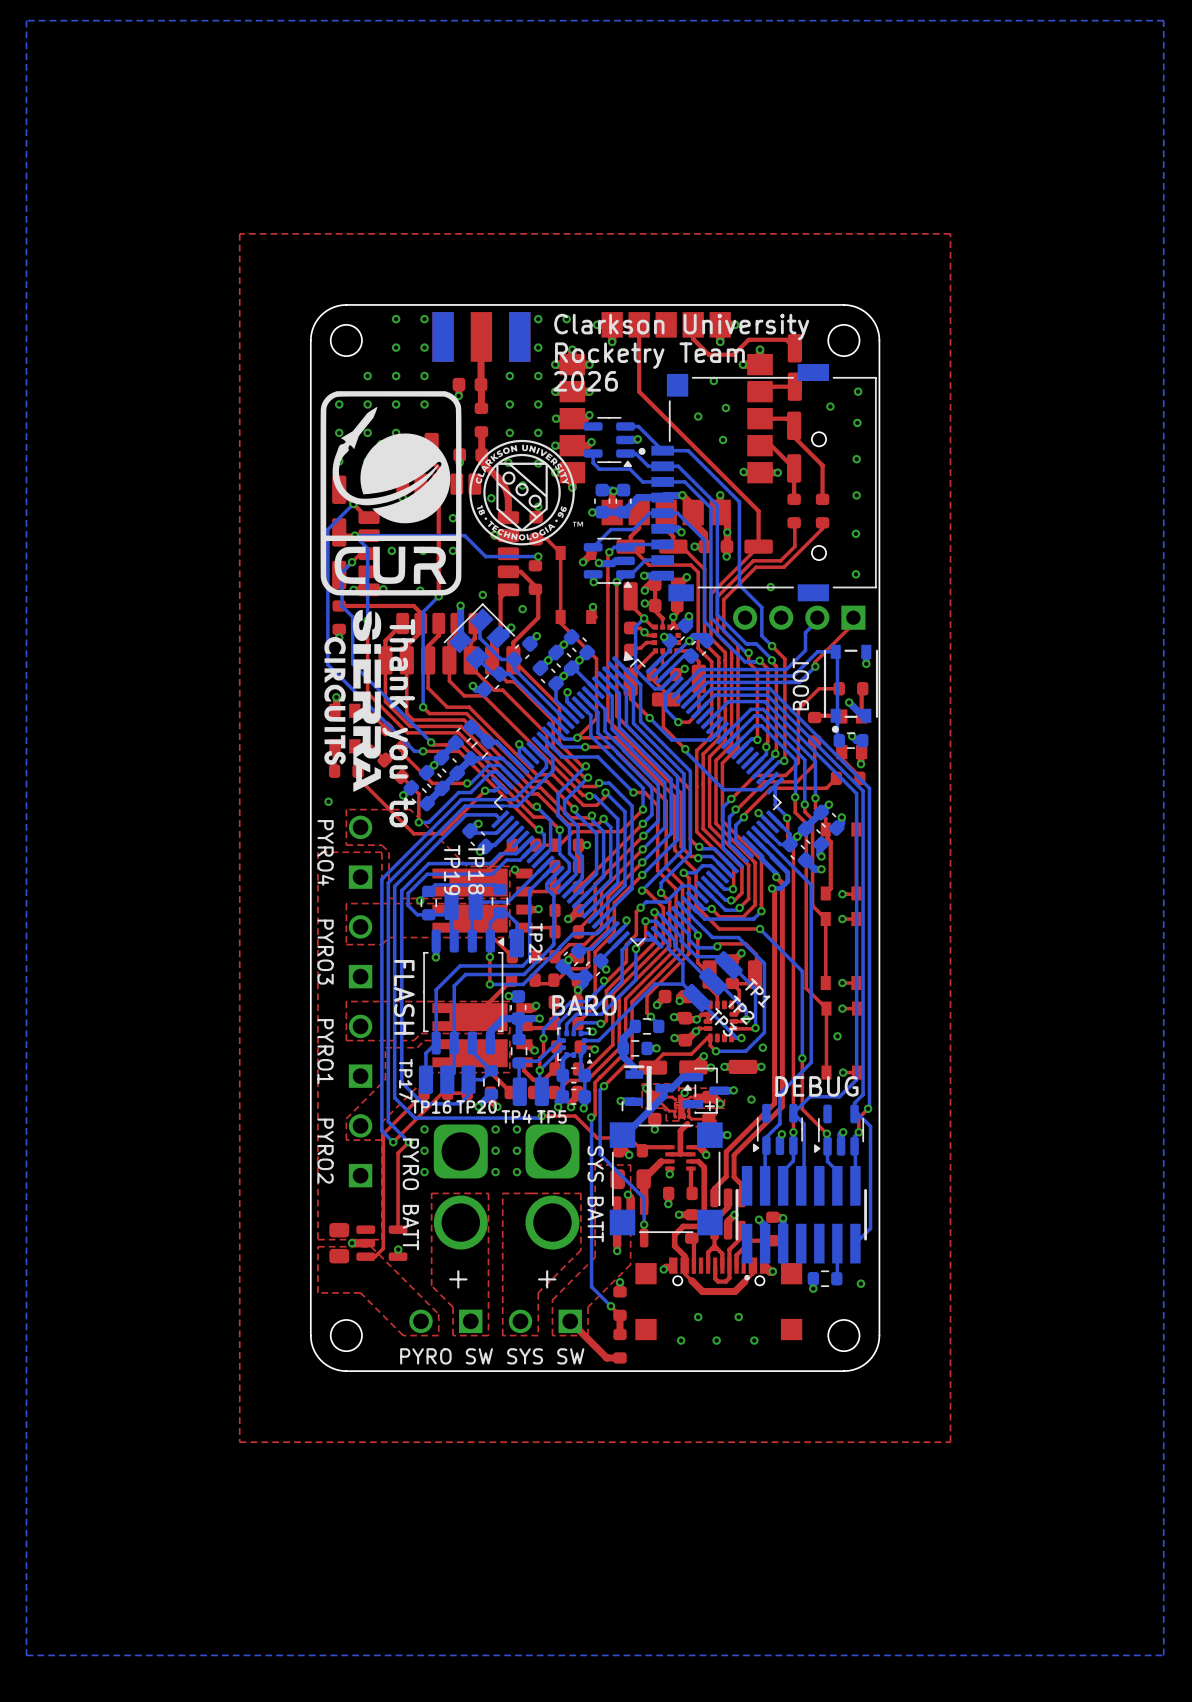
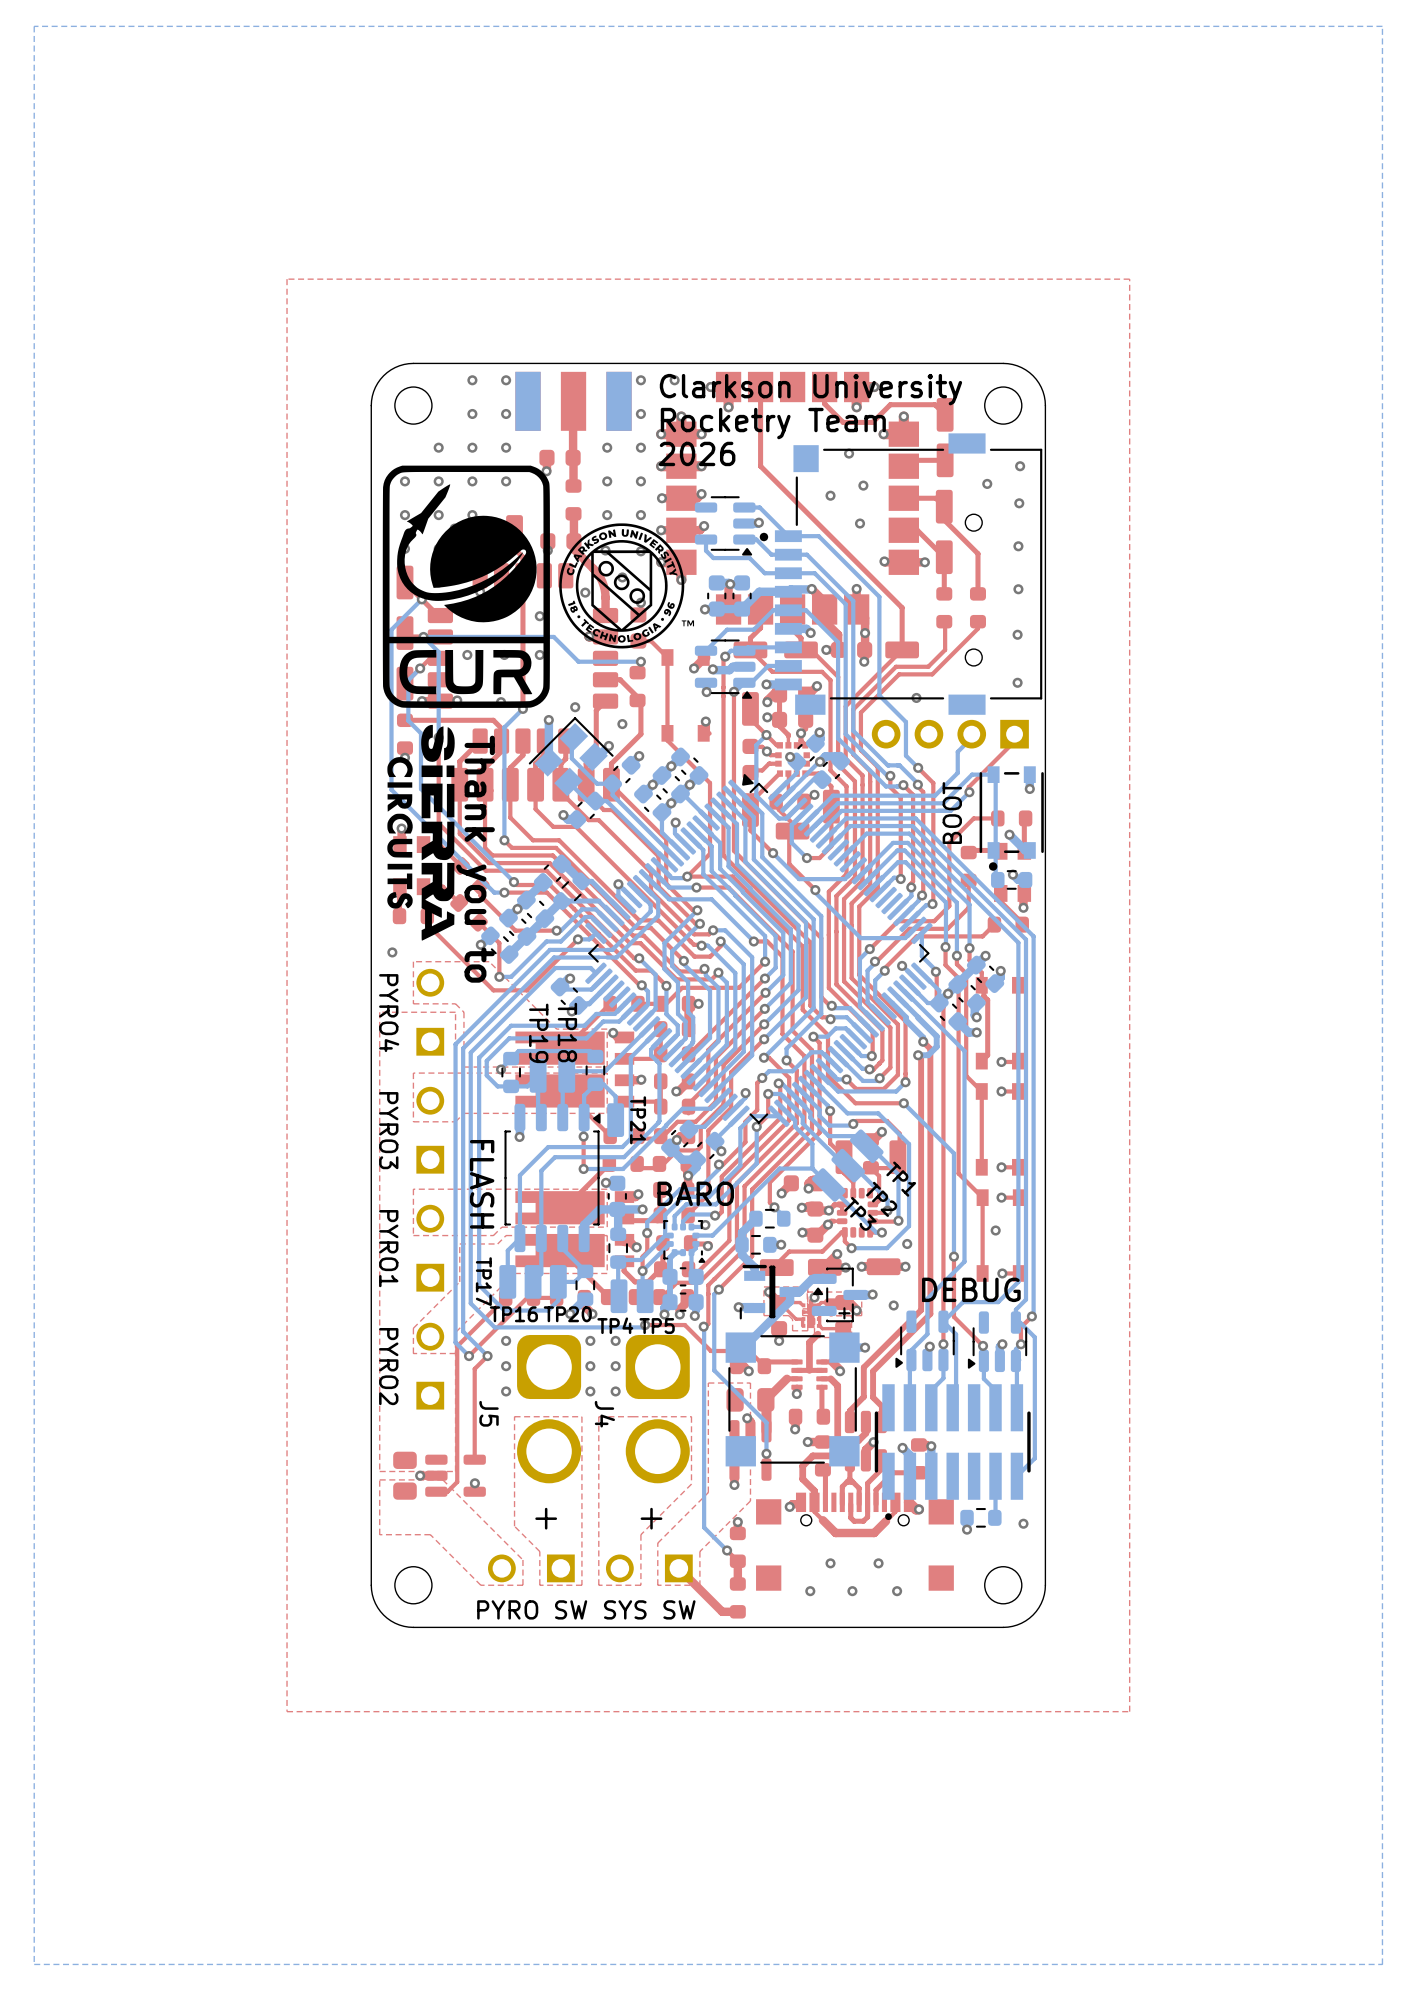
J5 name: none -> J5 (489, 1413)
J4 name: none -> J4 (604, 1414)
text: PYRO BATT (410, 1194) -> none
text: SYS BATT (595, 1194) -> none

